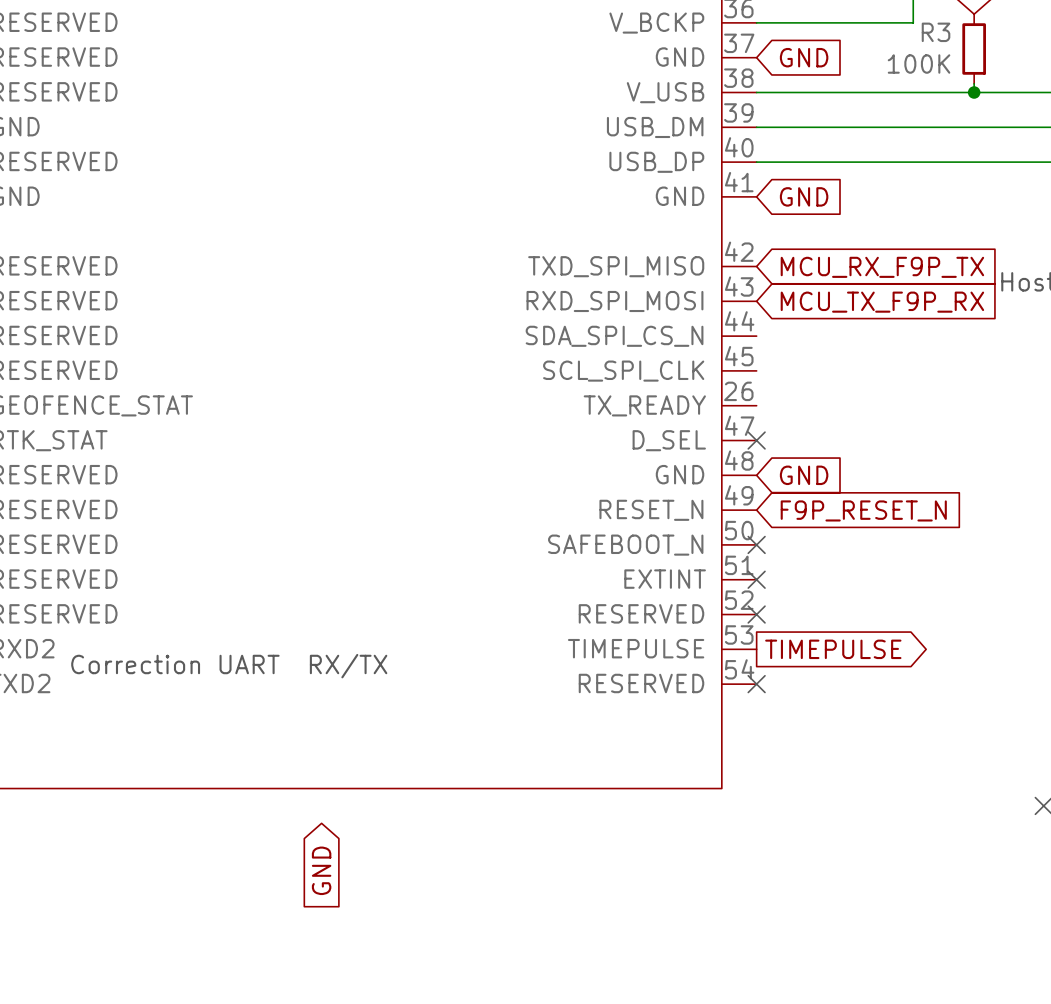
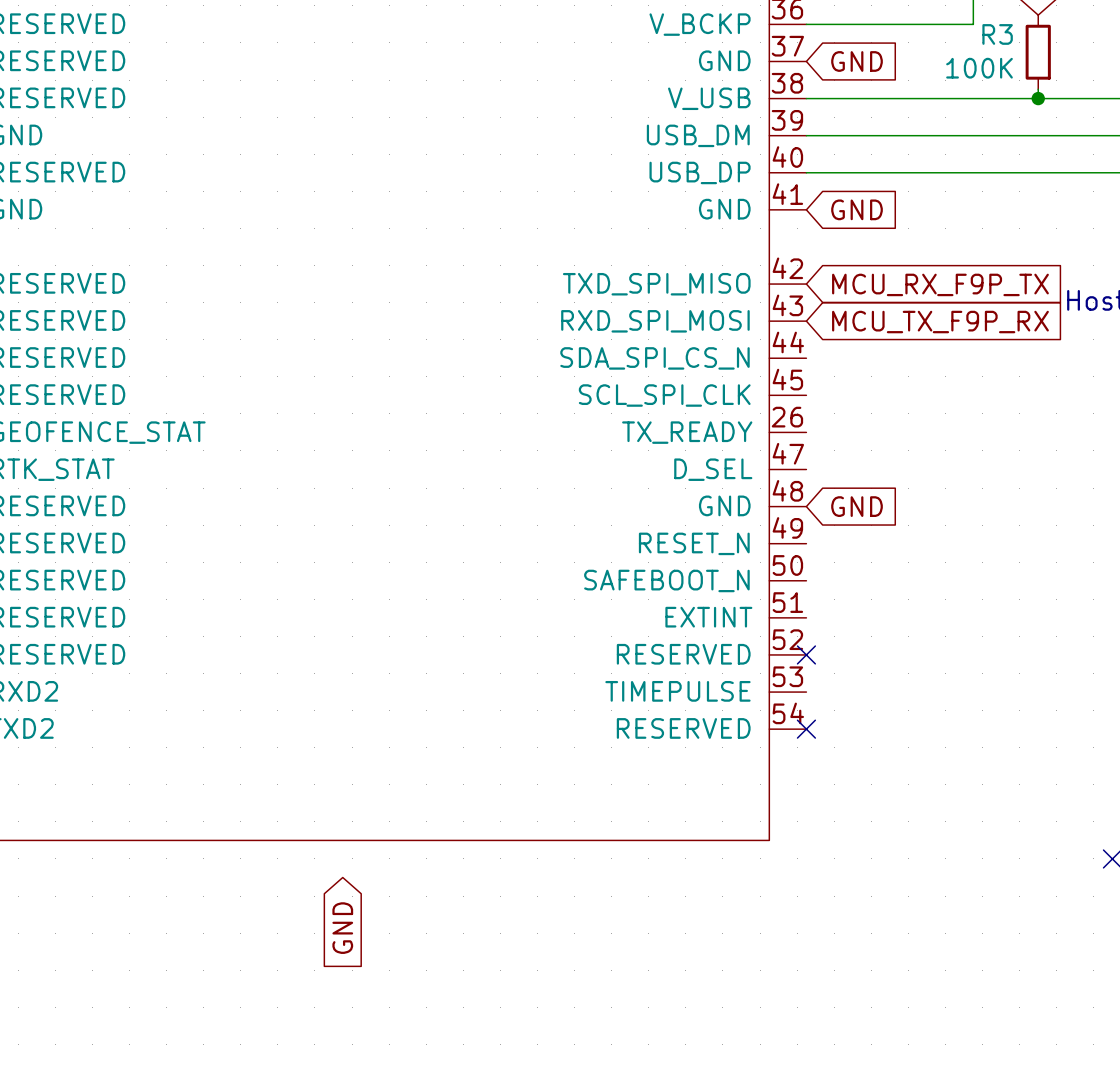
no-connect mark: (756, 440) -> none
global label: F9P_RESET_N (863, 510) -> none
no-connect mark: (756, 544) -> none
no-connect mark: (756, 579) -> none
global label: TIMEPULSE (833, 649) -> none
text: Correction UART RX/TX (229, 666) -> none

